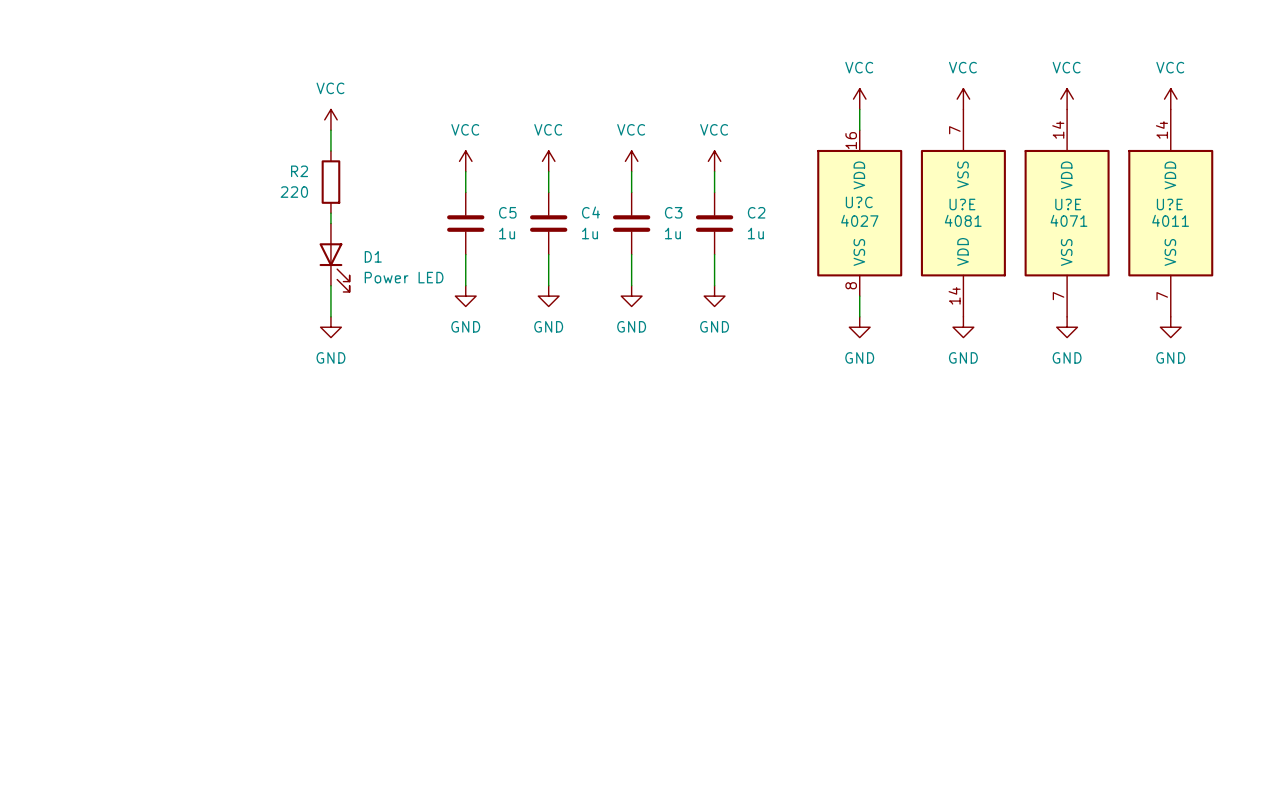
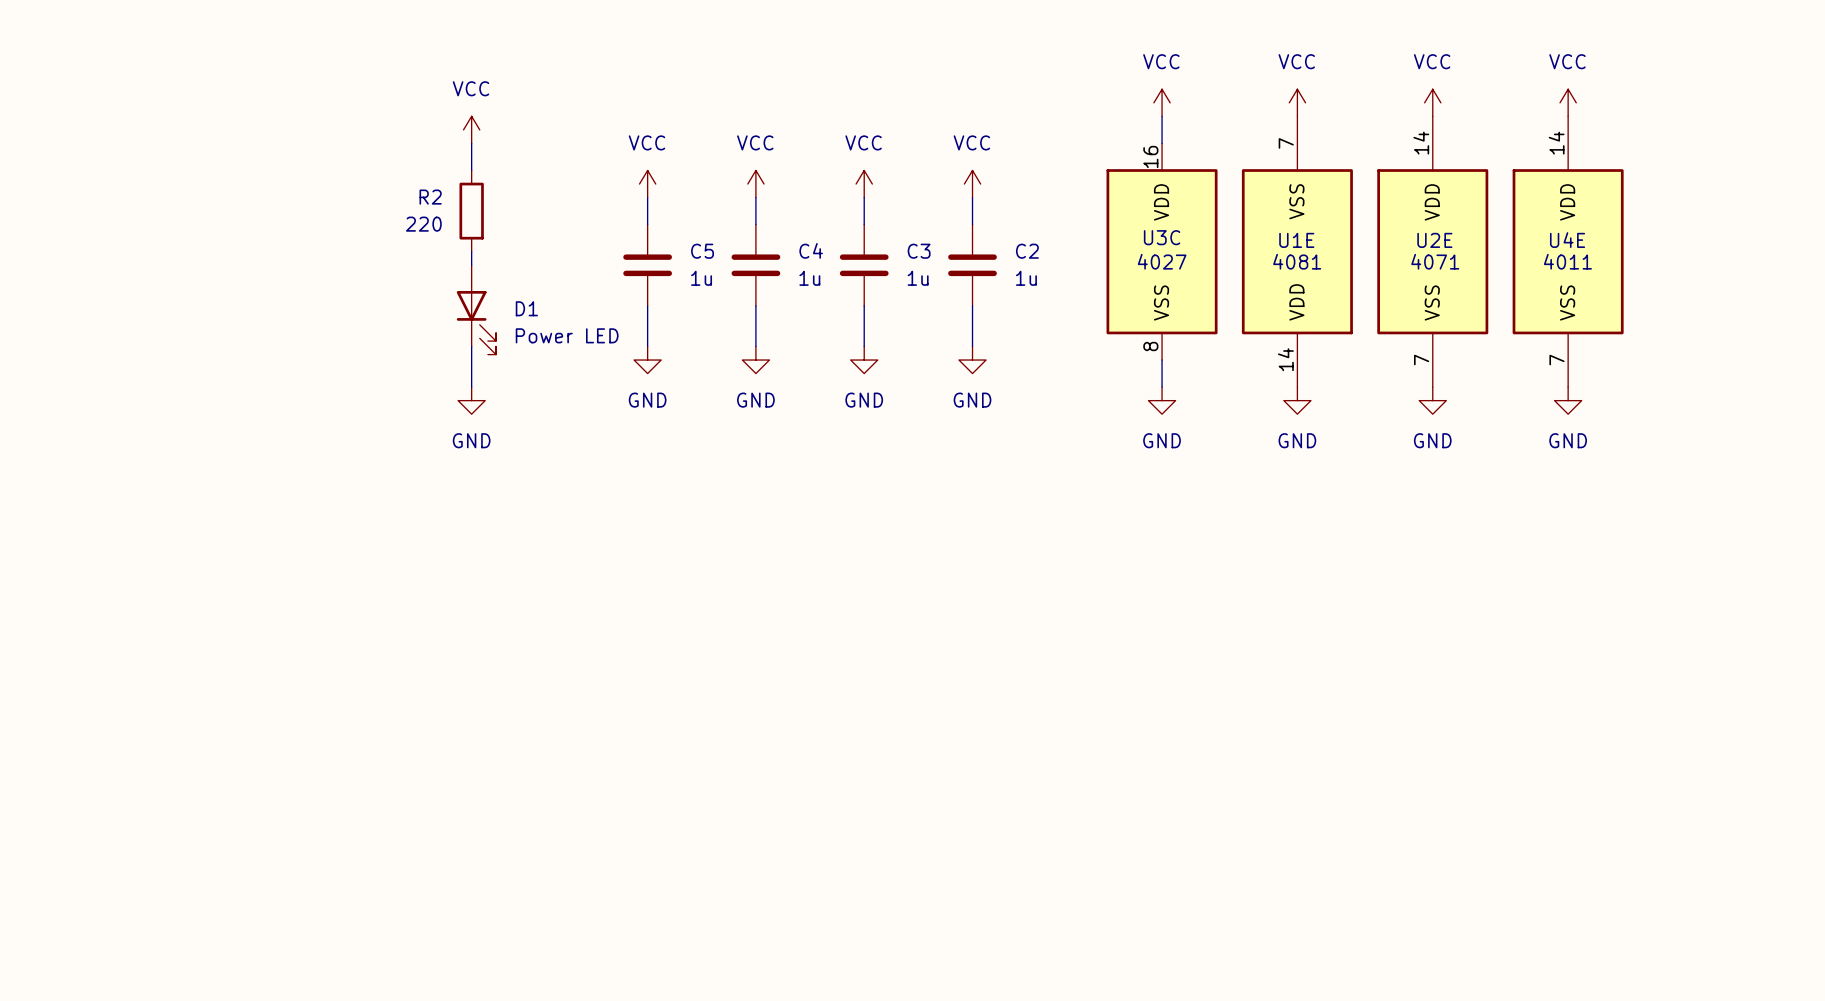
U?C name: U?C (859, 202) -> U3C (1162, 237)
U?E name: U?E (962, 204) -> U1E (1296, 240)
U?E name: U?E (1068, 204) -> U2E (1434, 240)
U?E name: U?E (1169, 204) -> U4E (1567, 240)

